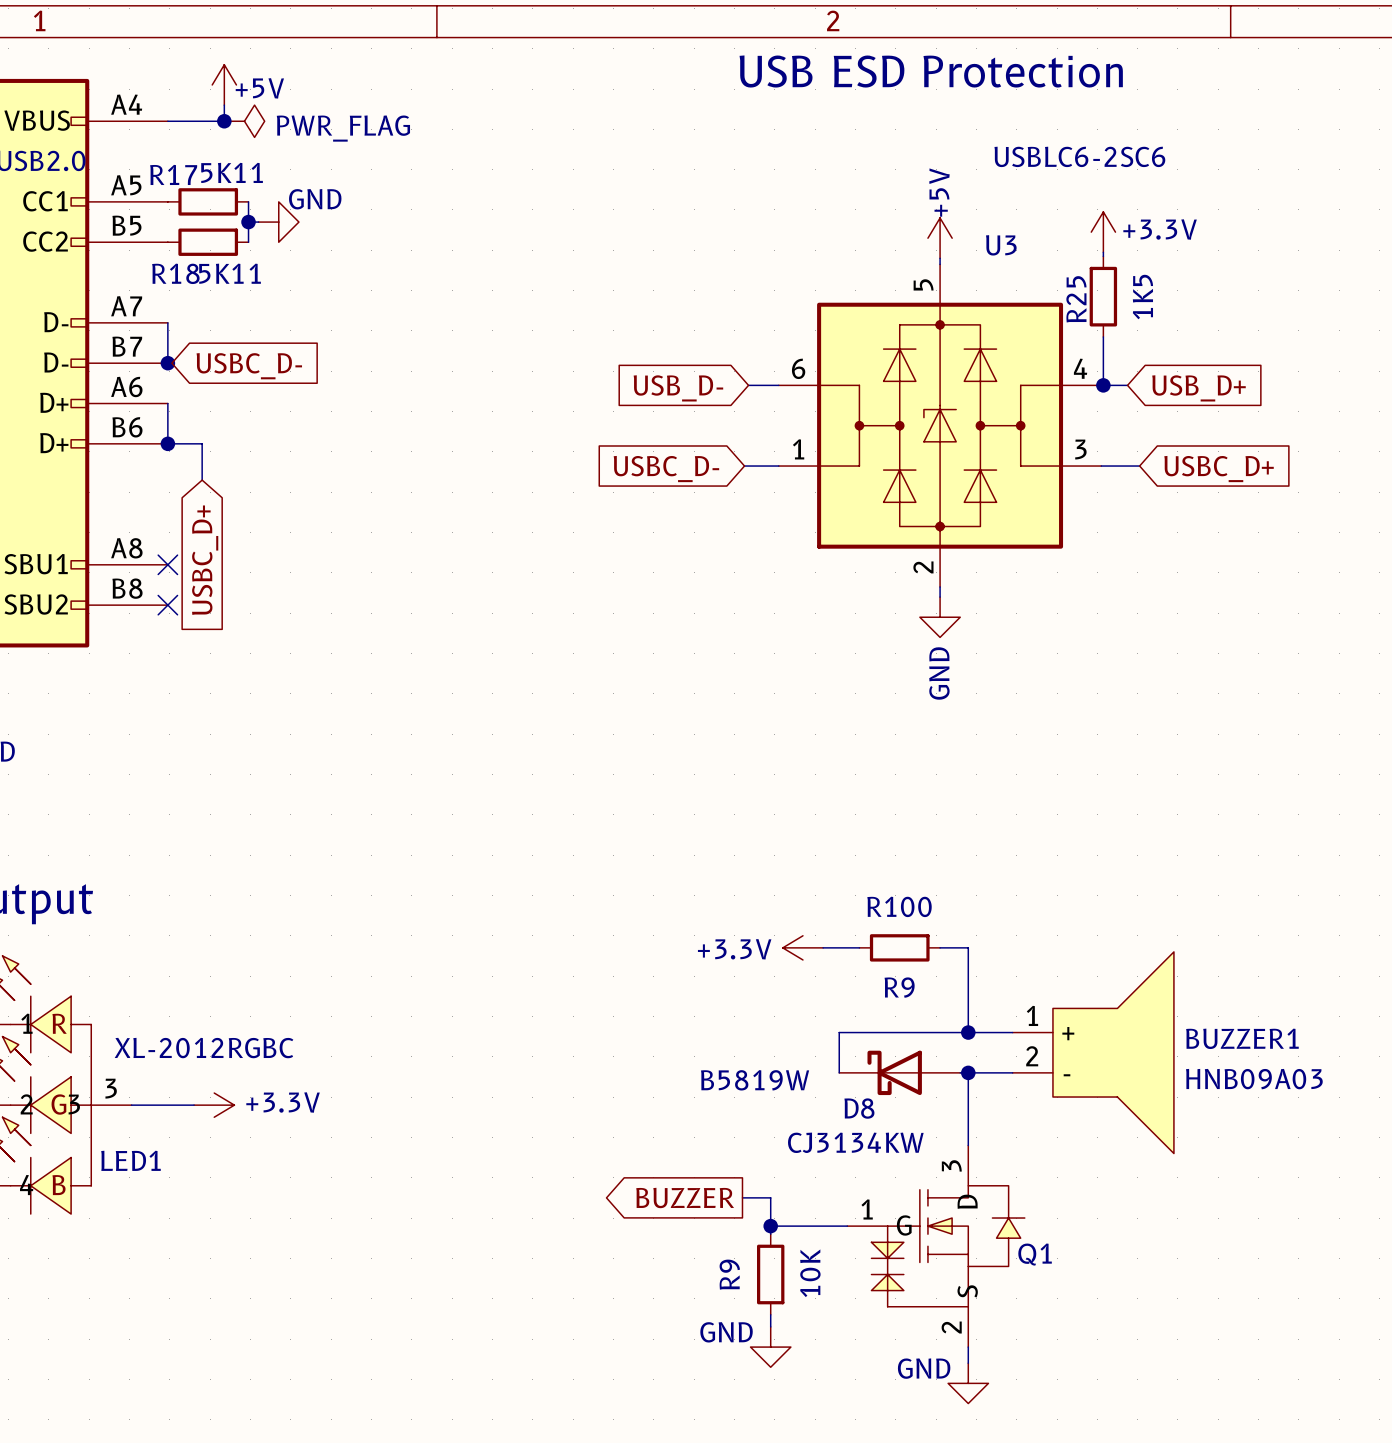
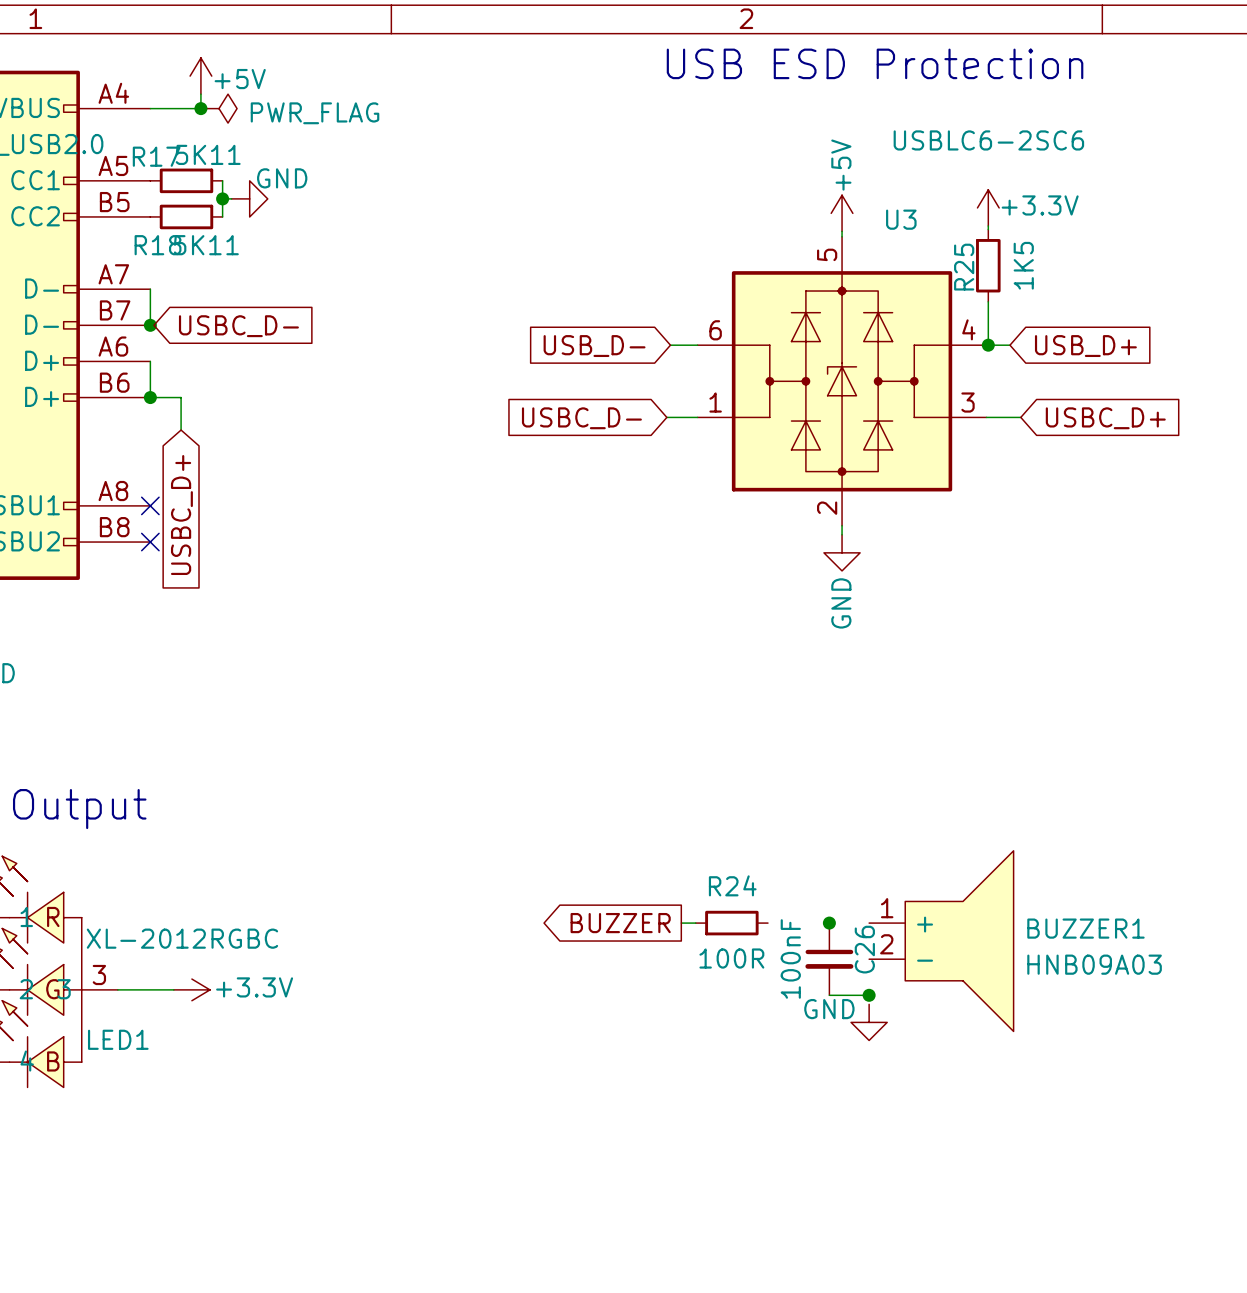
power symbol: +3.3V (802, 947) -> none
wire: (823, 947) (859, 947) -> none
R9: R100 (899, 947) -> none
wire: (940, 947) (968, 947) (968, 1032) -> none
wire: none -> (681, 923) (695, 923)
R24: none -> 100R (731, 923)
junction: none -> (829, 923)
junction: (968, 1032) -> none
wire: (1012, 1032) (839, 1032) (839, 1072) -> none
BUZZER1 position: (1093, 1052) -> (941, 941)
C26: none -> 100nF (829, 959)
D8: B5819W (899, 1072) -> none
wire: (960, 1072) (1012, 1072) -> none
wire: (968, 1072) (968, 1145) -> none
junction: (968, 1072) -> none
wire: none -> (829, 995) (869, 995)
junction: none -> (869, 995)
power symbol: none -> GND (869, 1022)
global label position: BUZZER (685, 1197) -> BUZZER (620, 923)
wire: (742, 1197) (770, 1197) (770, 1234) -> none
wire: (770, 1226) (847, 1226) -> none
junction: (770, 1226) -> none
Q1: CJ3134KW (936, 1246) -> none
R9: 10K (770, 1274) -> none
wire: (770, 1314) (770, 1326) -> none
power symbol: GND (770, 1347) -> none
wire: (968, 1347) (968, 1363) -> none
power symbol: GND (968, 1383) -> none

